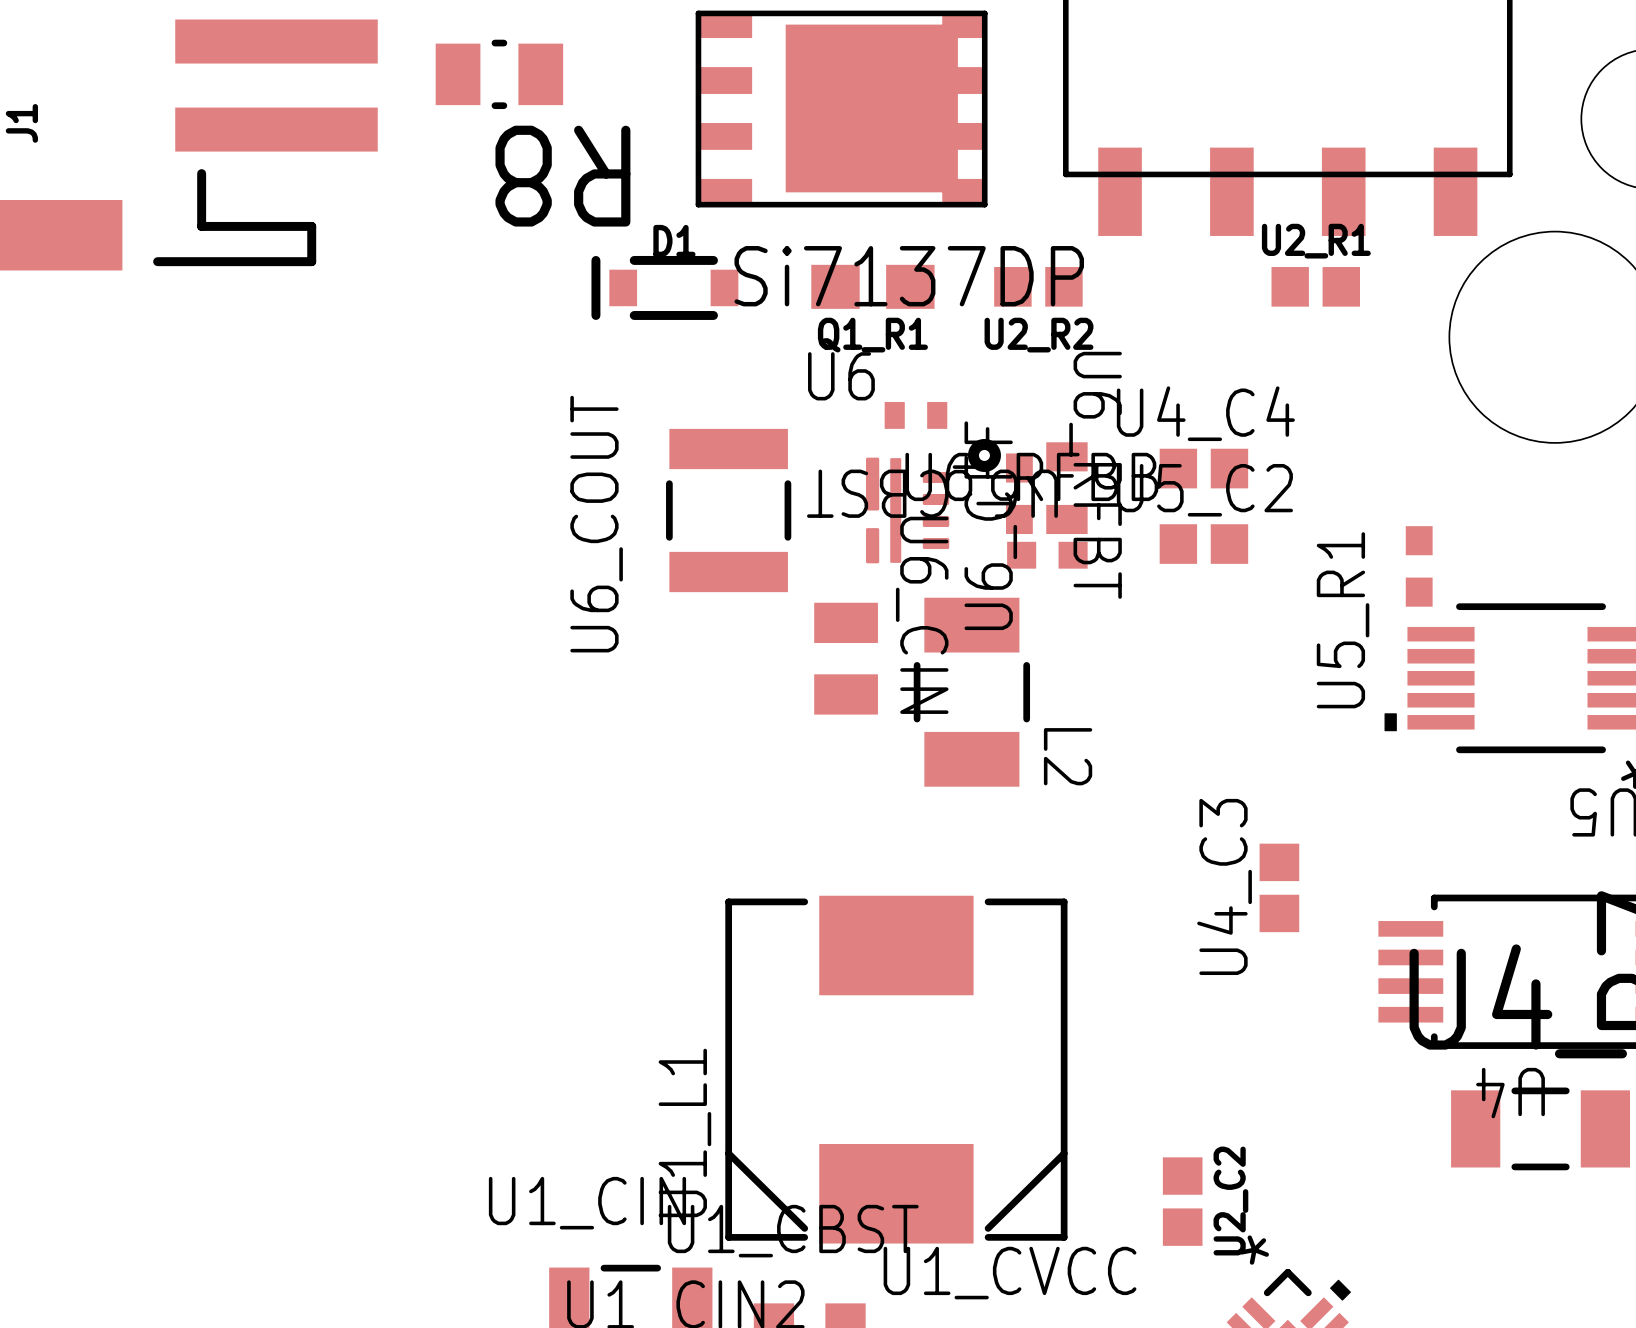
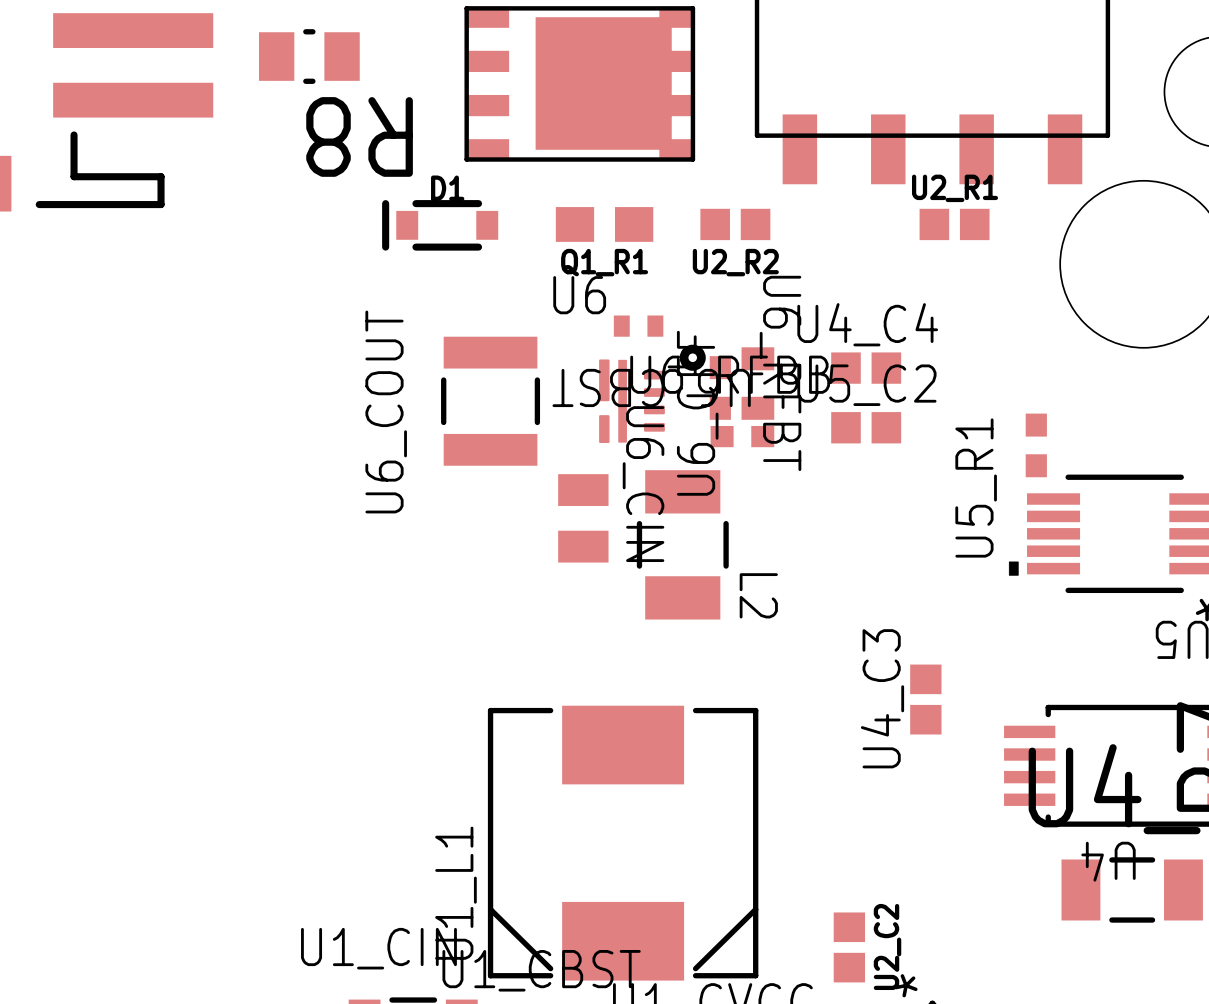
part value: Si7137DP (909, 276) -> none

